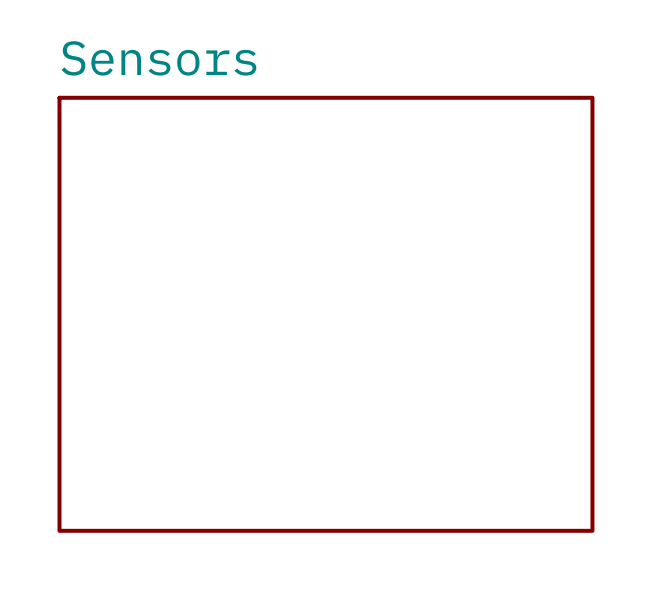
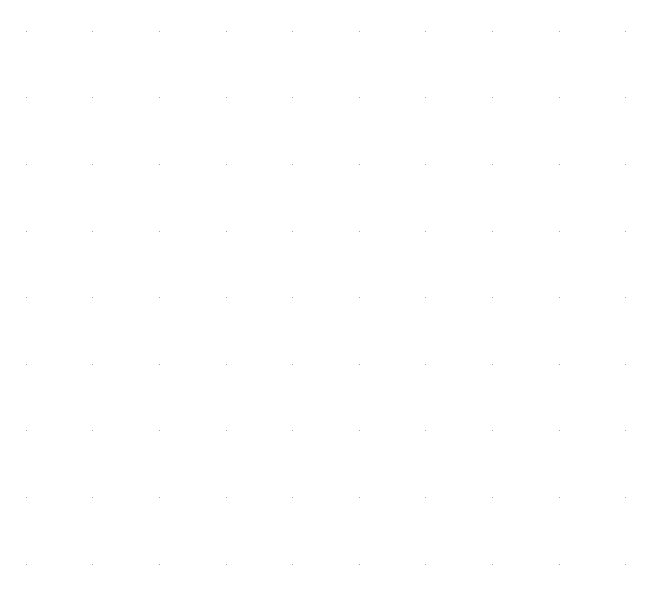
sheet Sensors: (325, 314) -> none

